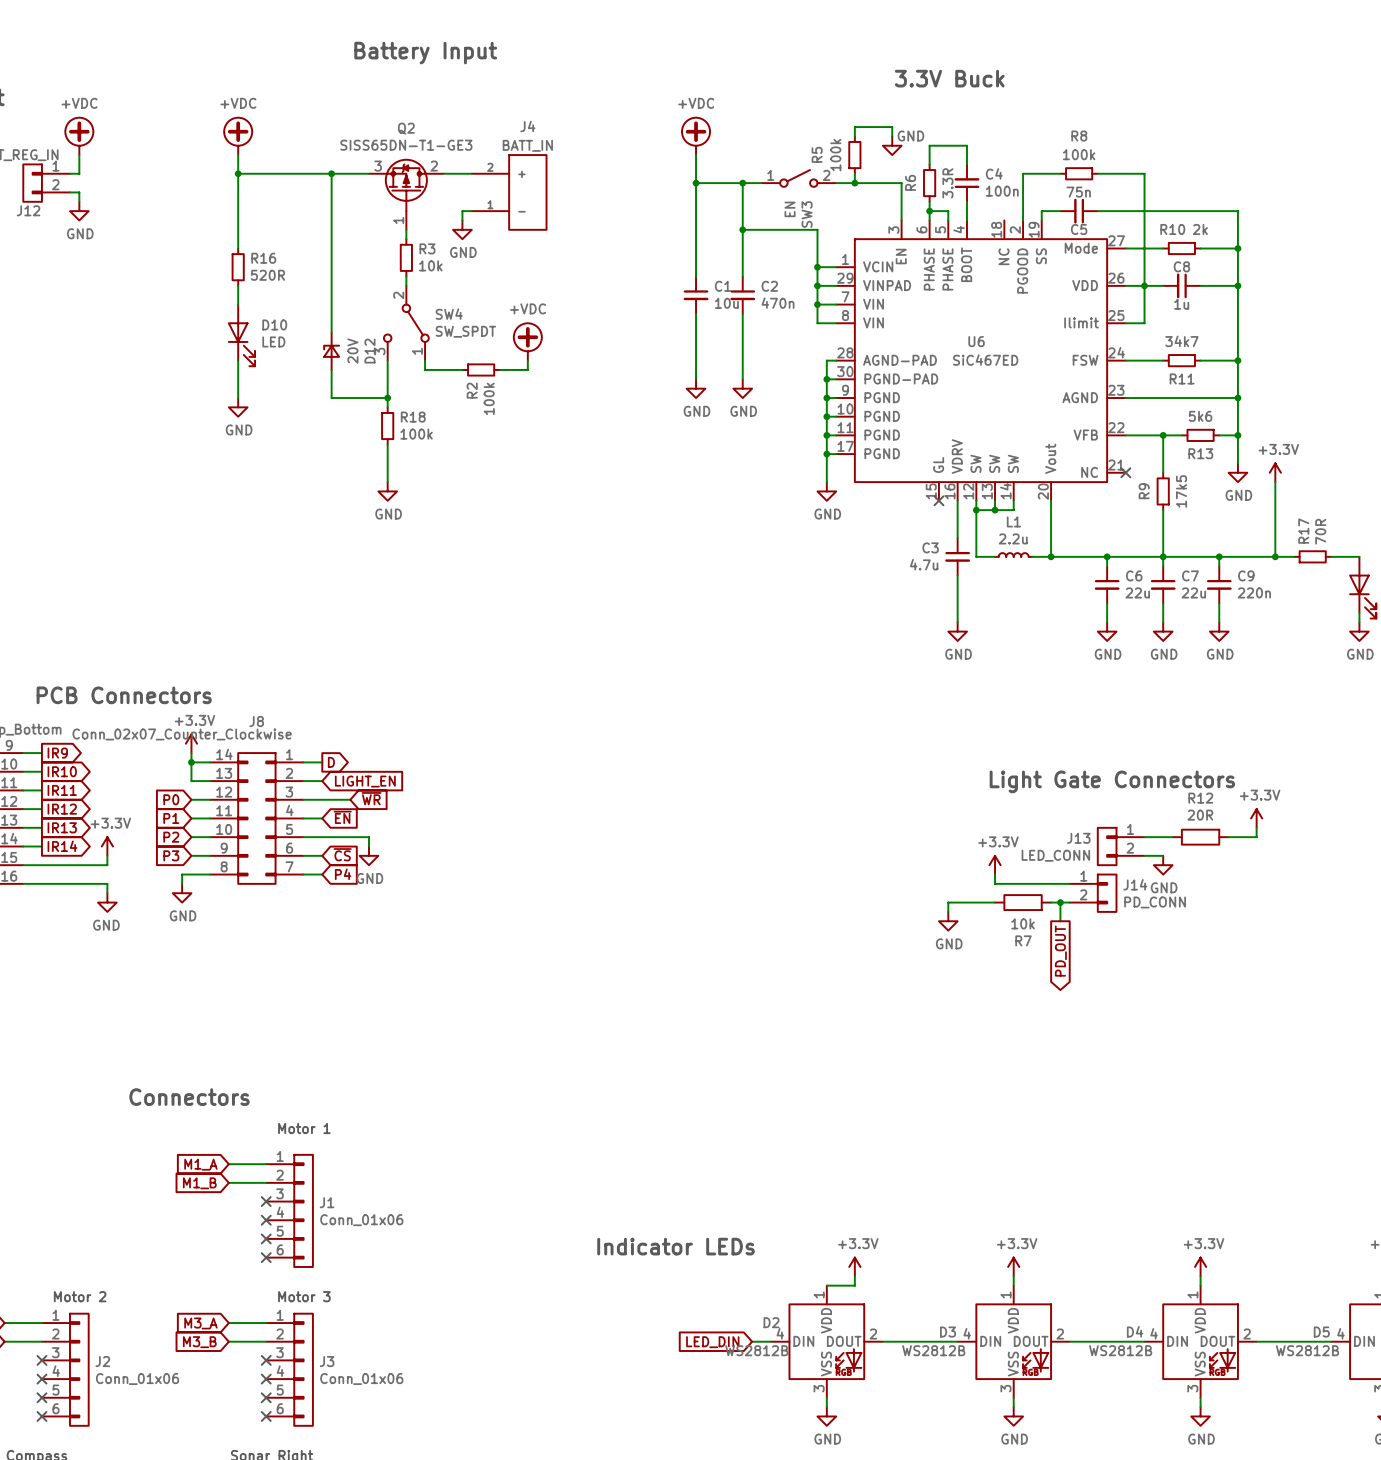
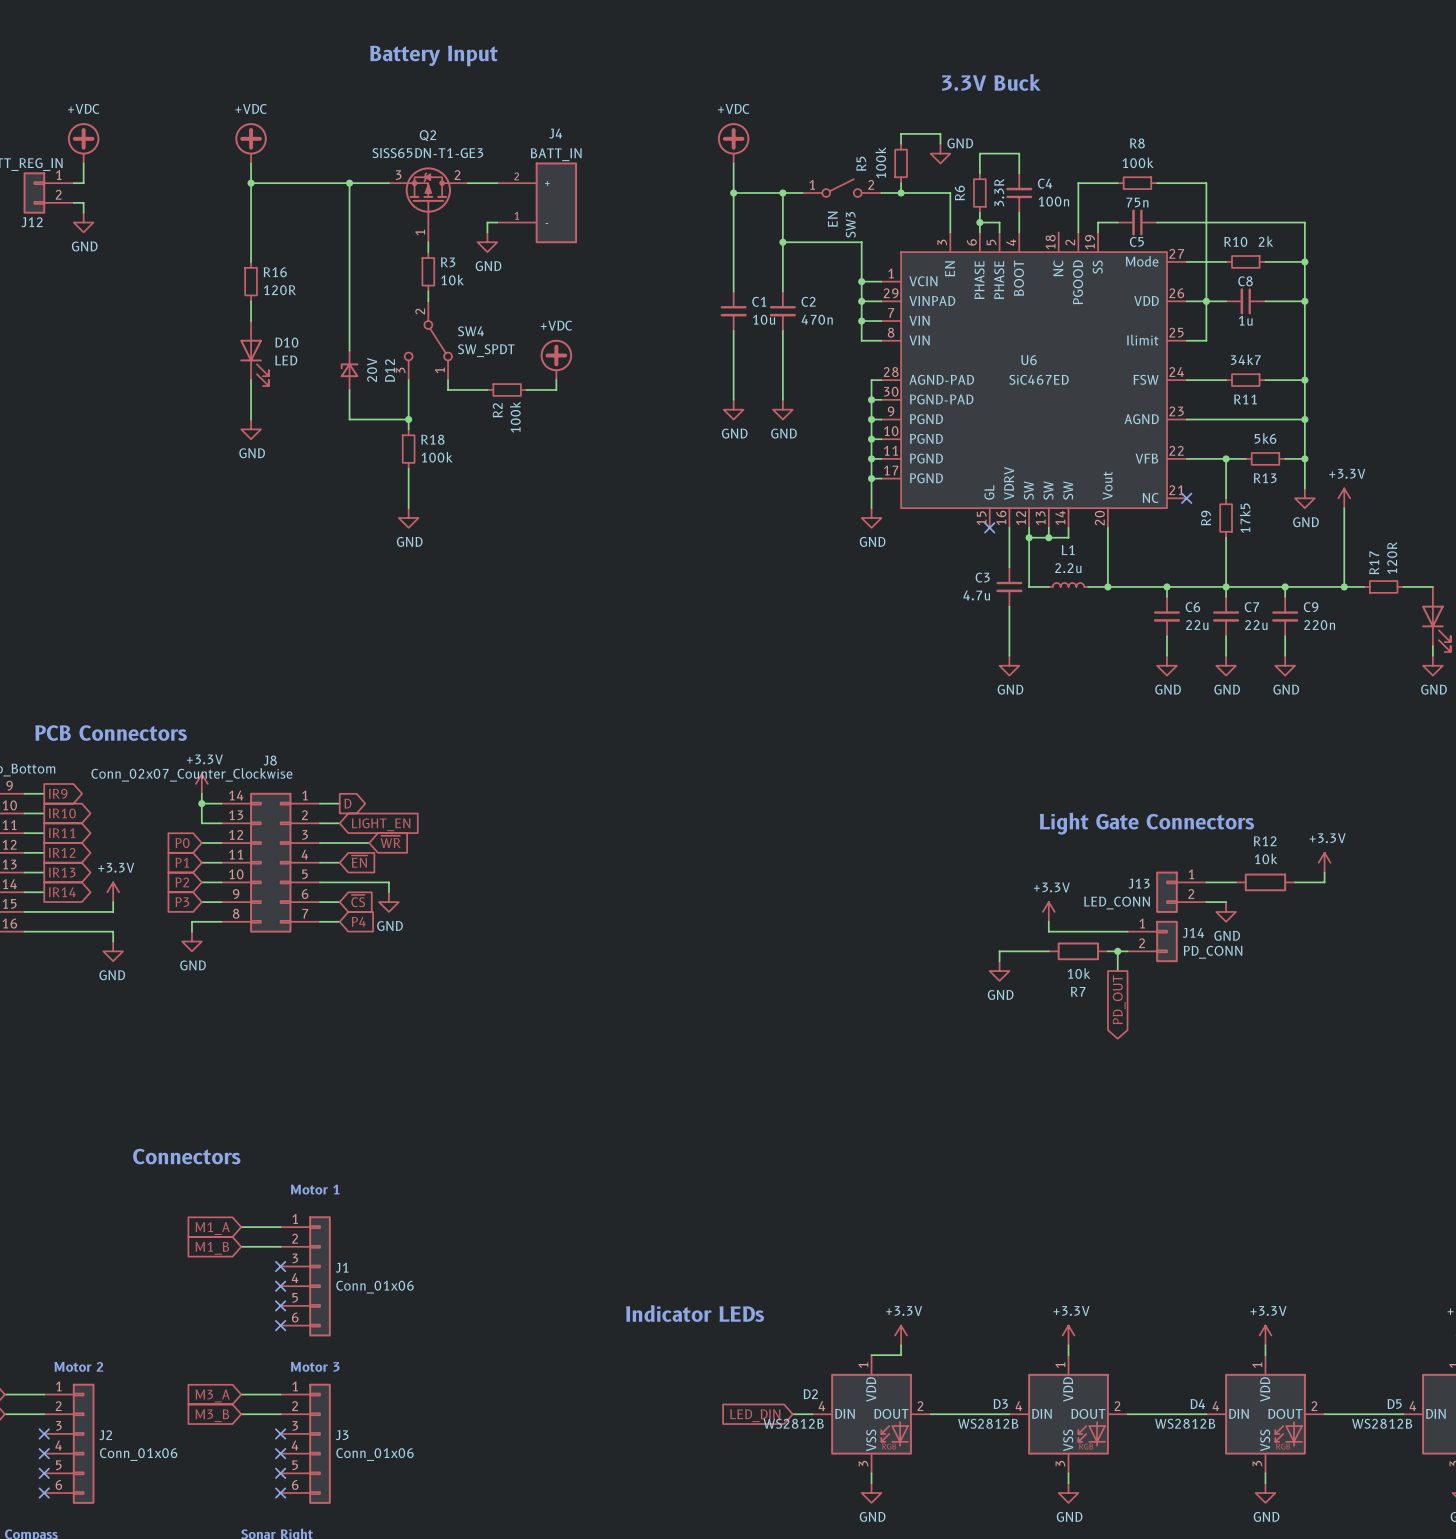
R16 value: 520R (267, 275) -> 120R (279, 290)
R17 value: 70R (1320, 531) -> 120R (1392, 558)
R12 value: 20R (1200, 815) -> 10k (1266, 858)

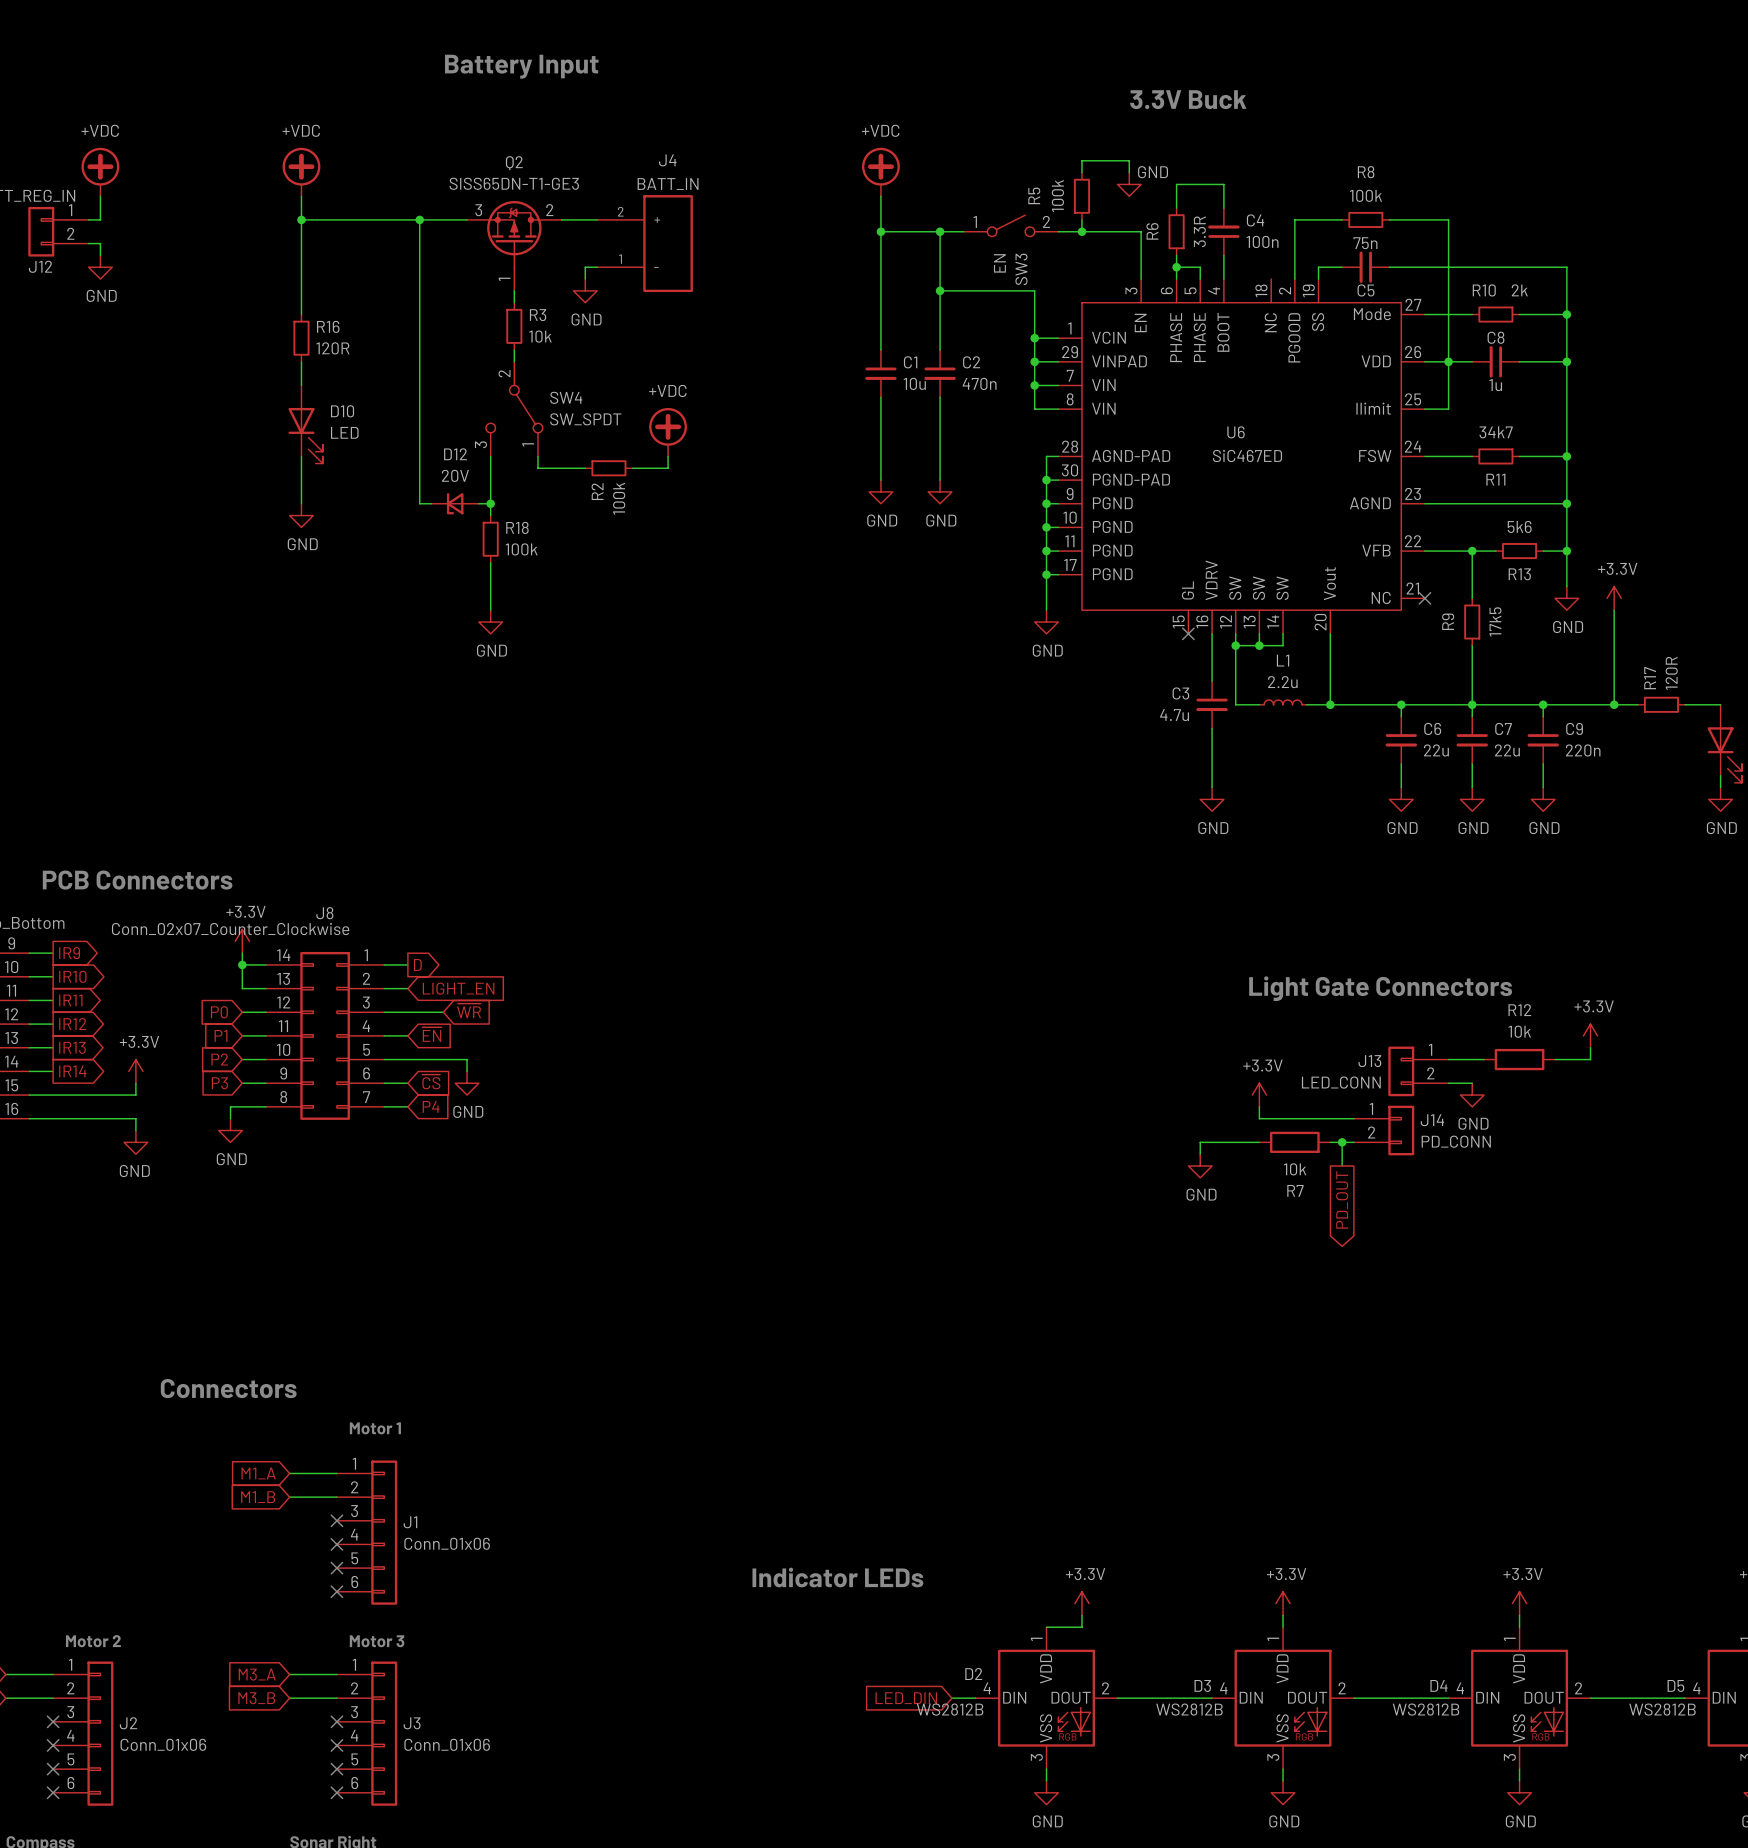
D12 rotation: 0° (349, 370) -> 90° counterclockwise (455, 503)
D12 position: (349, 370) -> (455, 503)

